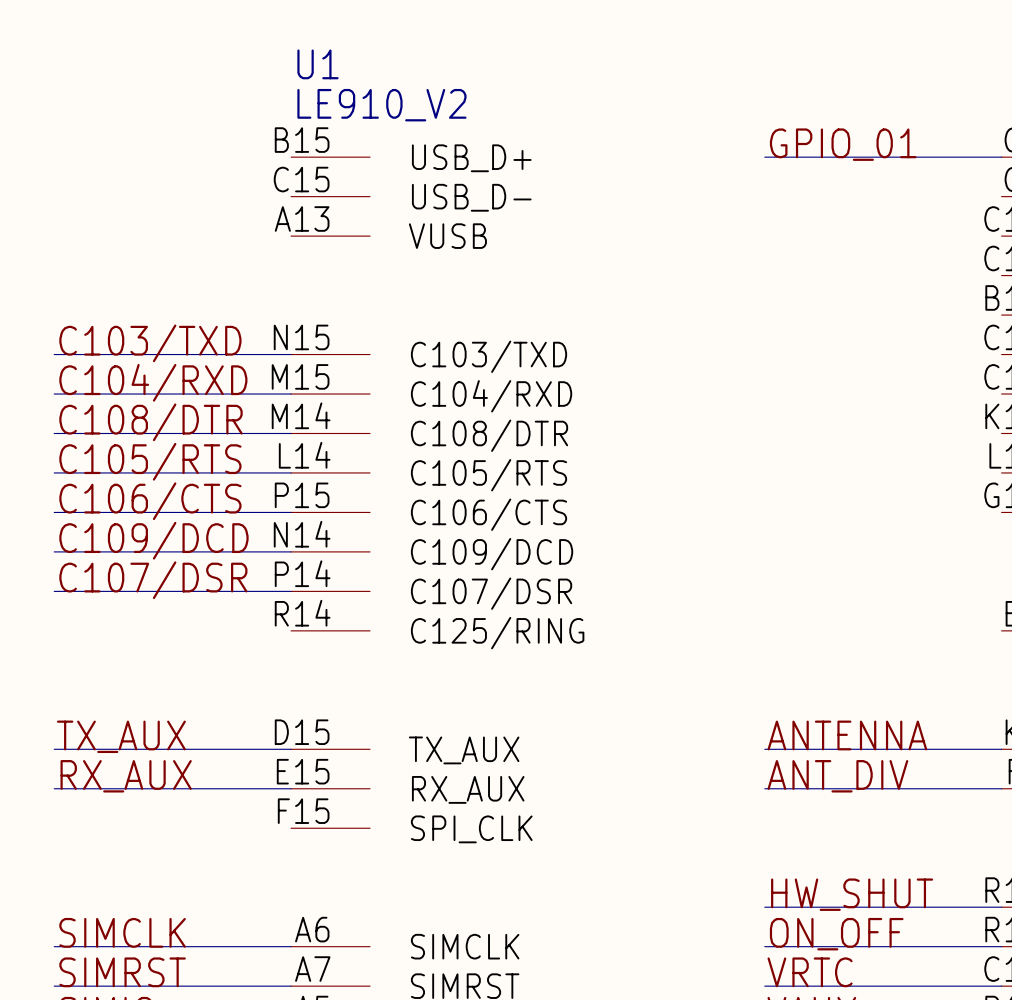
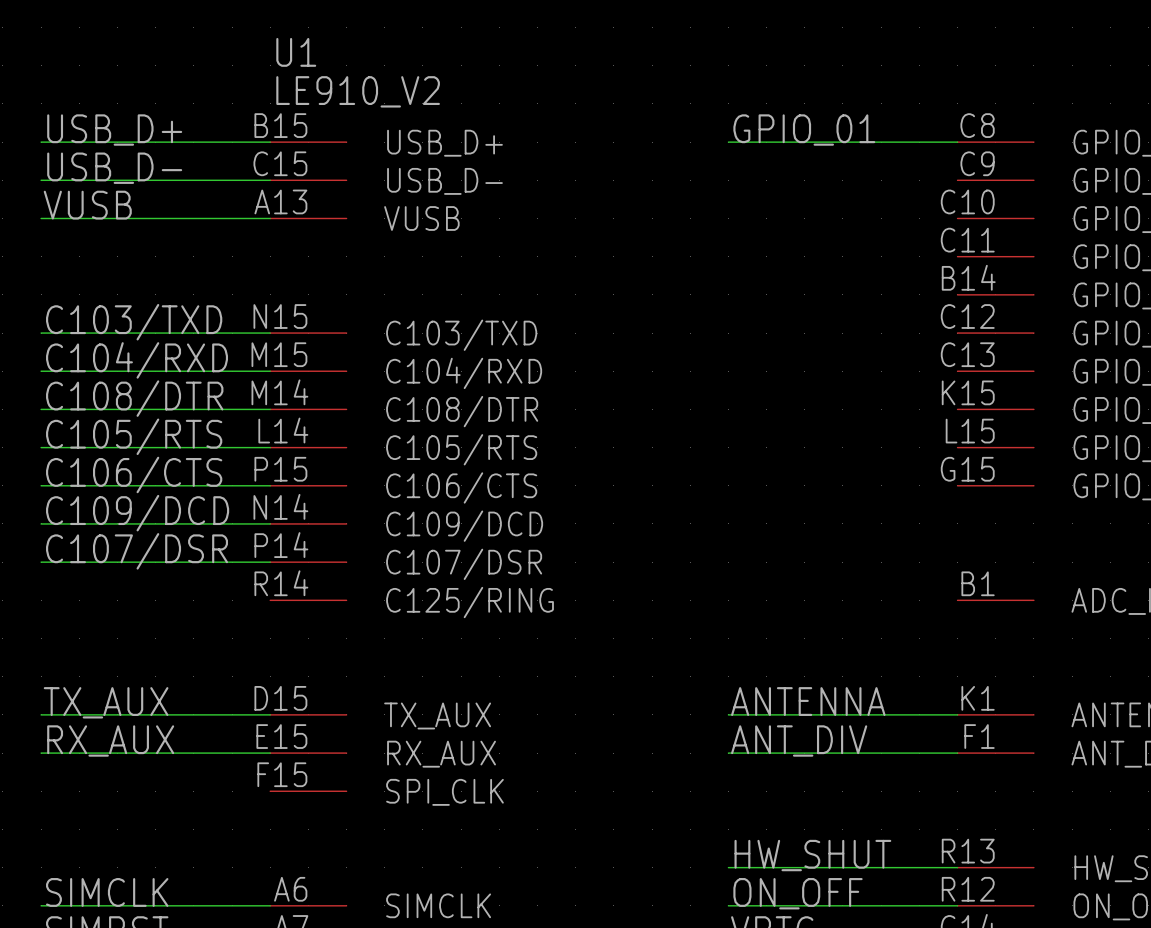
label: none -> USB_D+ (114, 130)
wire: none -> (41, 142) (270, 142)
label: none -> USB_D- (114, 168)
wire: none -> (41, 180) (270, 180)
label: none -> VUSB (87, 205)
wire: none -> (41, 218) (270, 218)

